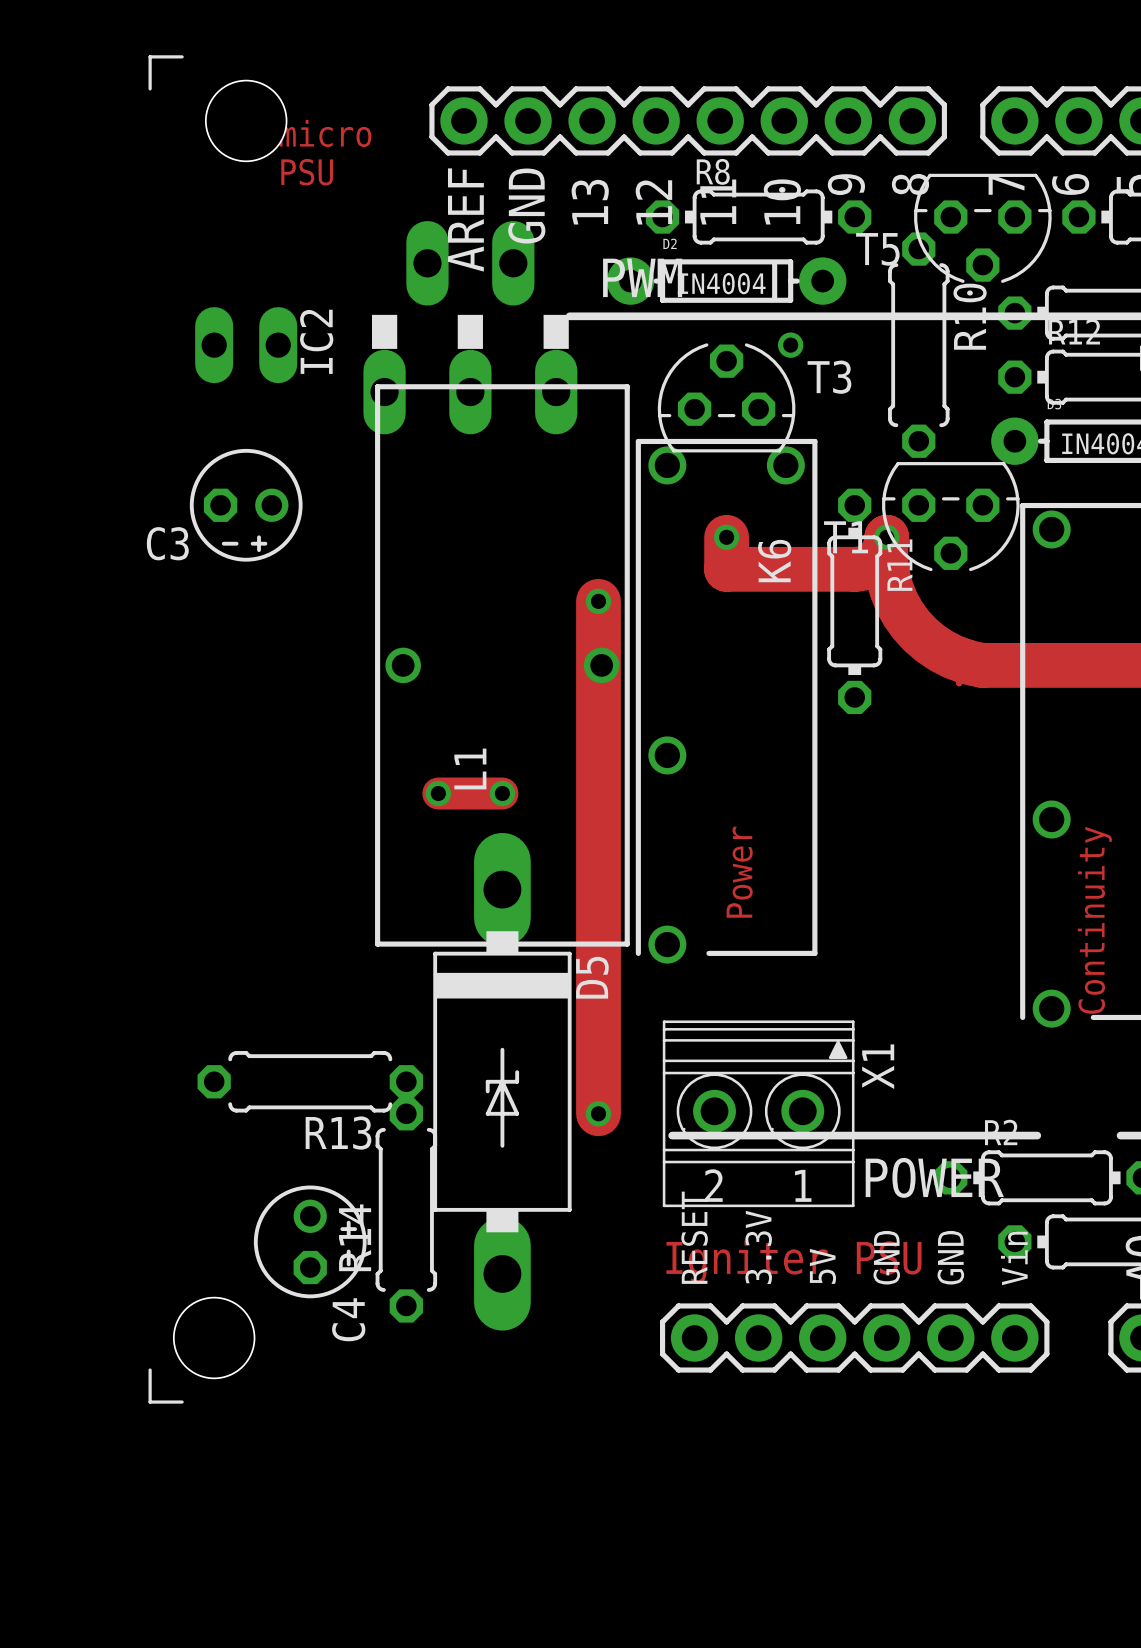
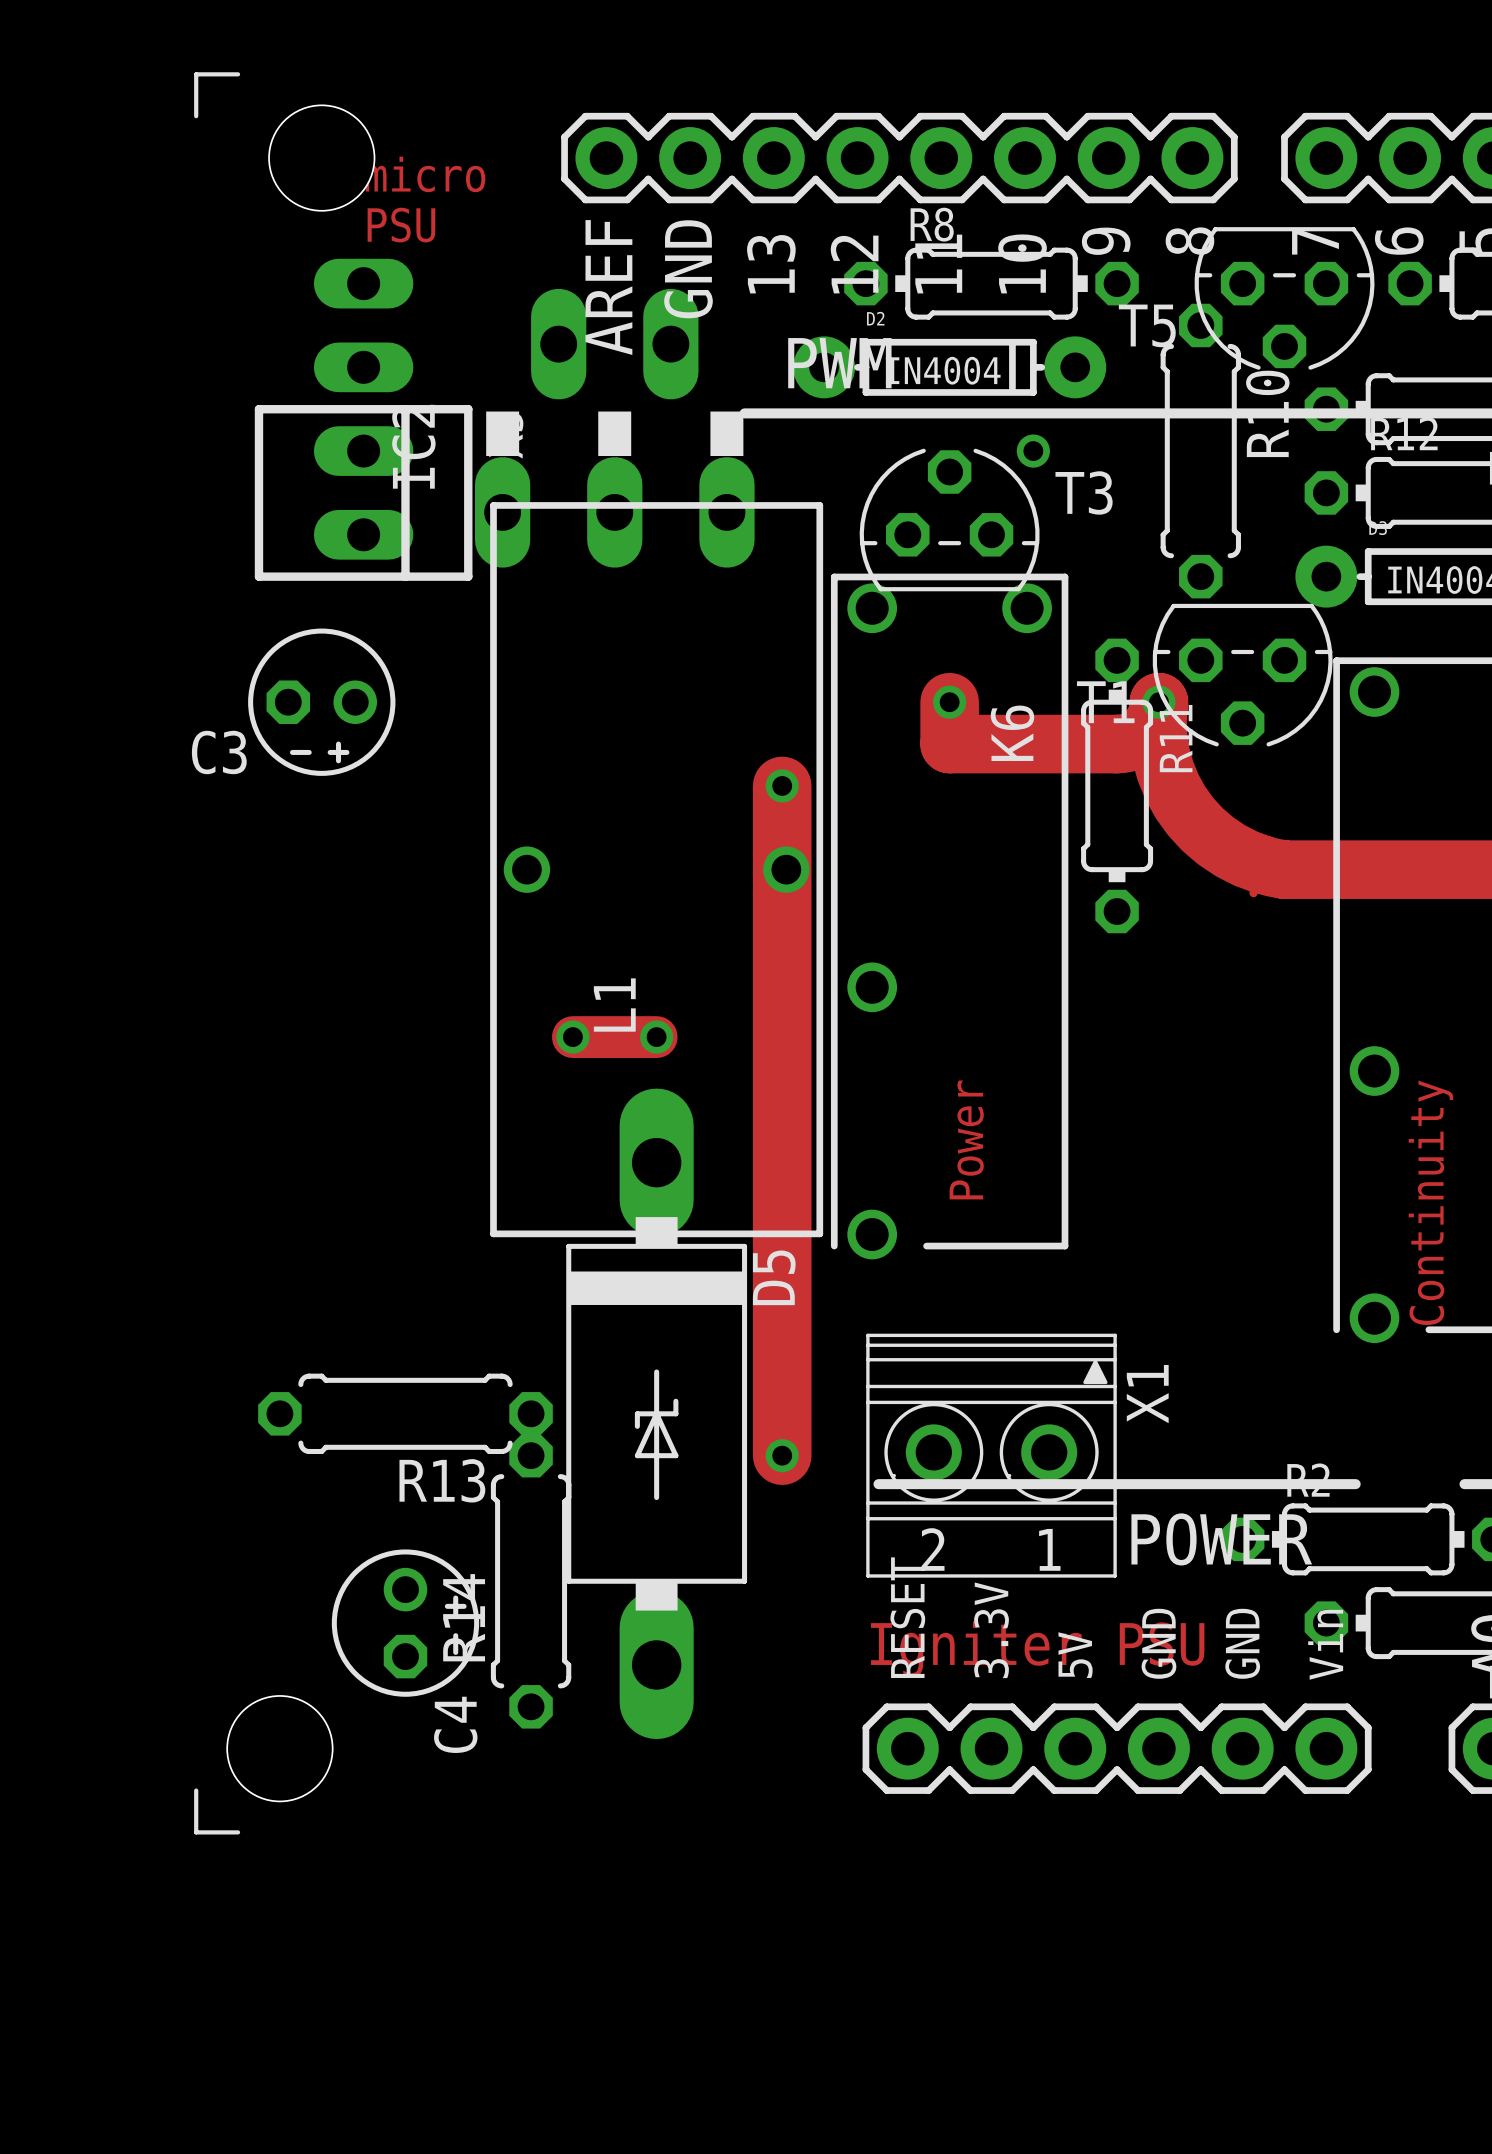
part rotation: 0° (246, 345) -> 90° clockwise (363, 325)
part position: (246, 345) -> (363, 325)
part: none -> (363, 492)
C3 position: (246, 505) -> (321, 702)

